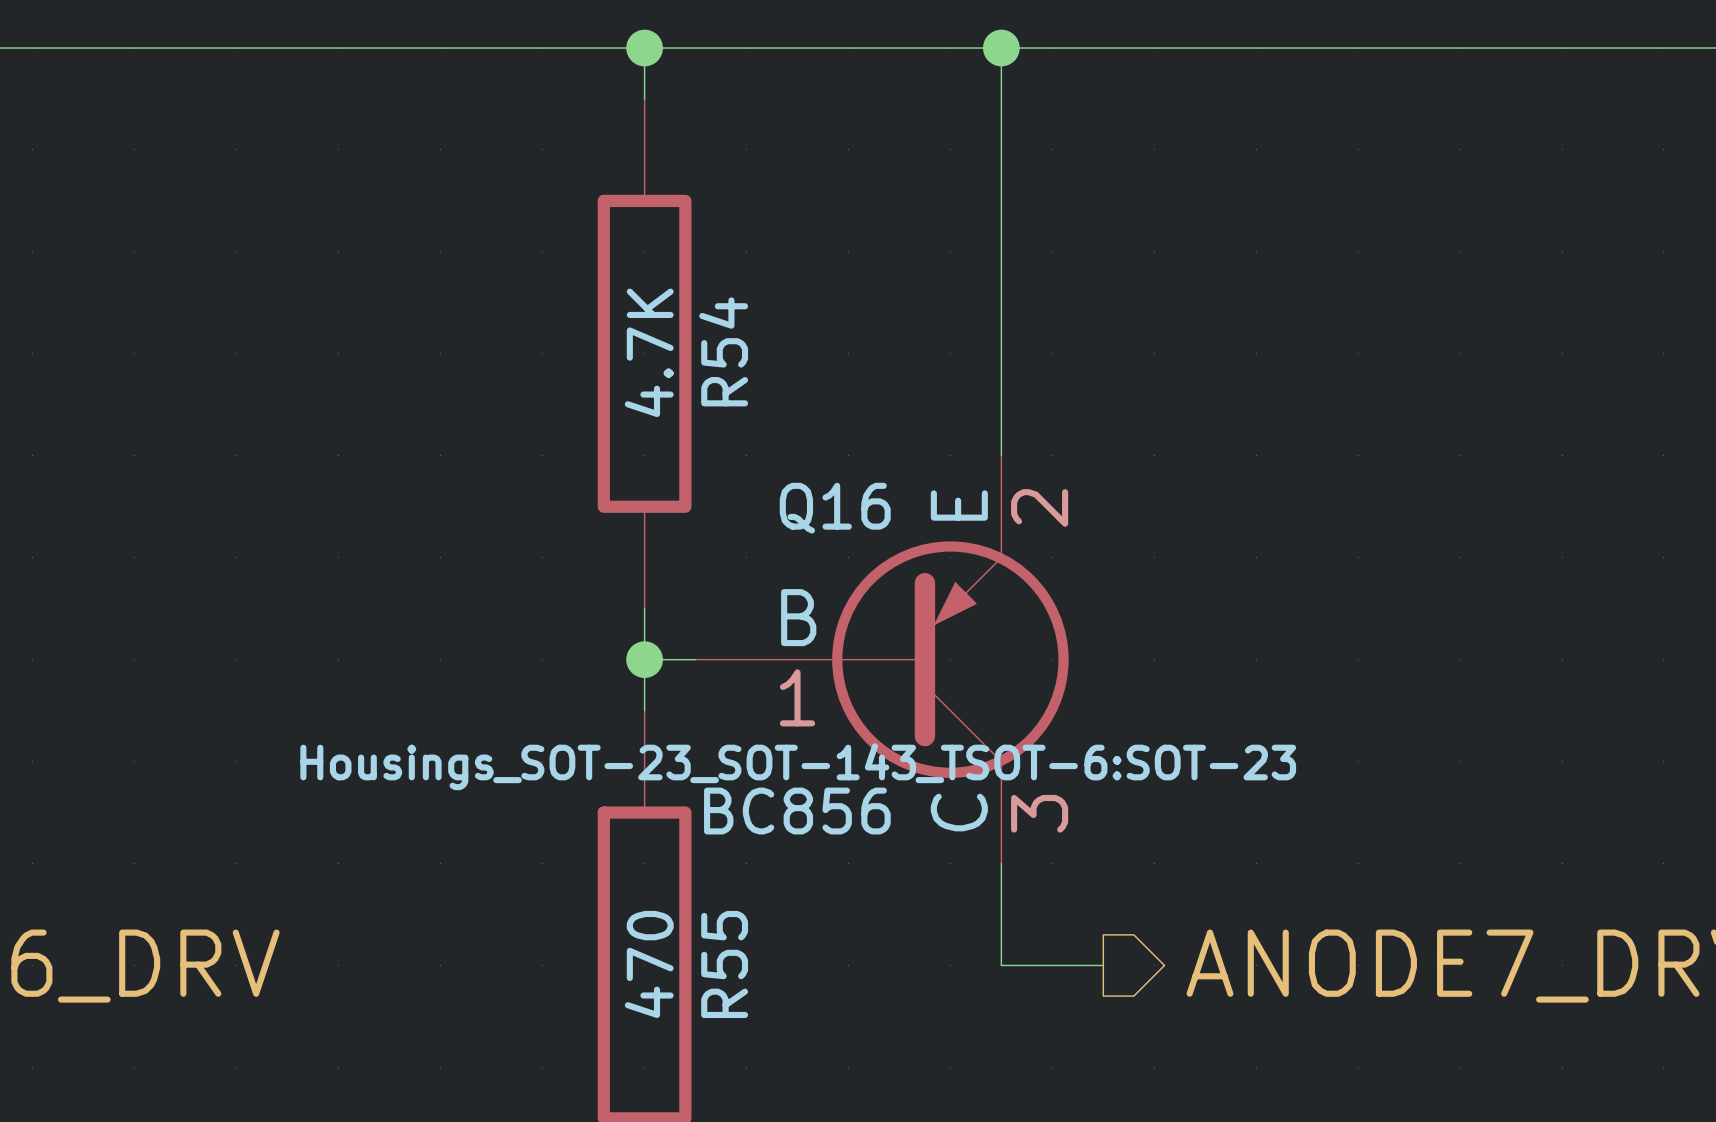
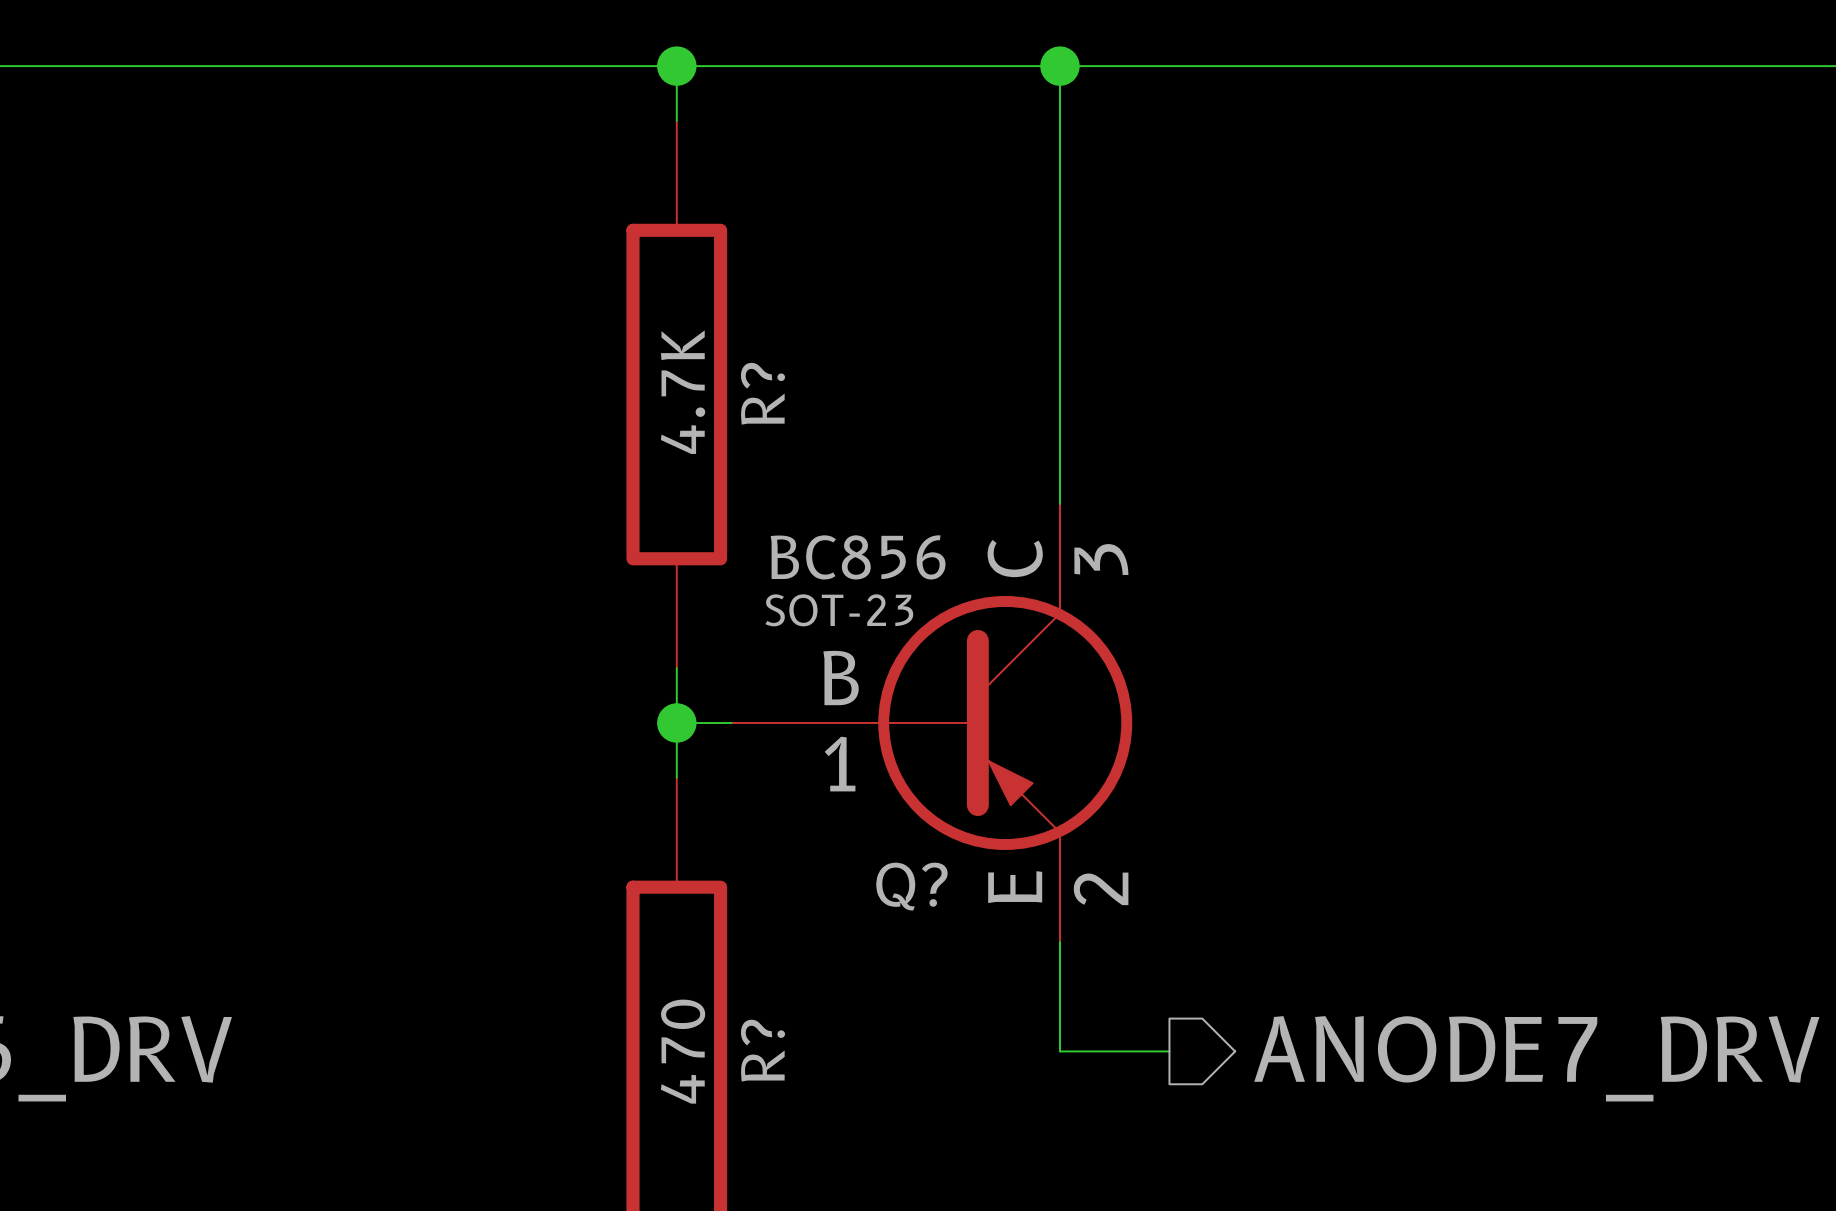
R54 name: R54 (723, 351) -> R? (763, 393)
Q16: BC856 (882, 659) -> none
Q?: none -> BC856 (931, 722)
R55 name: R55 (724, 964) -> R? (763, 1050)

